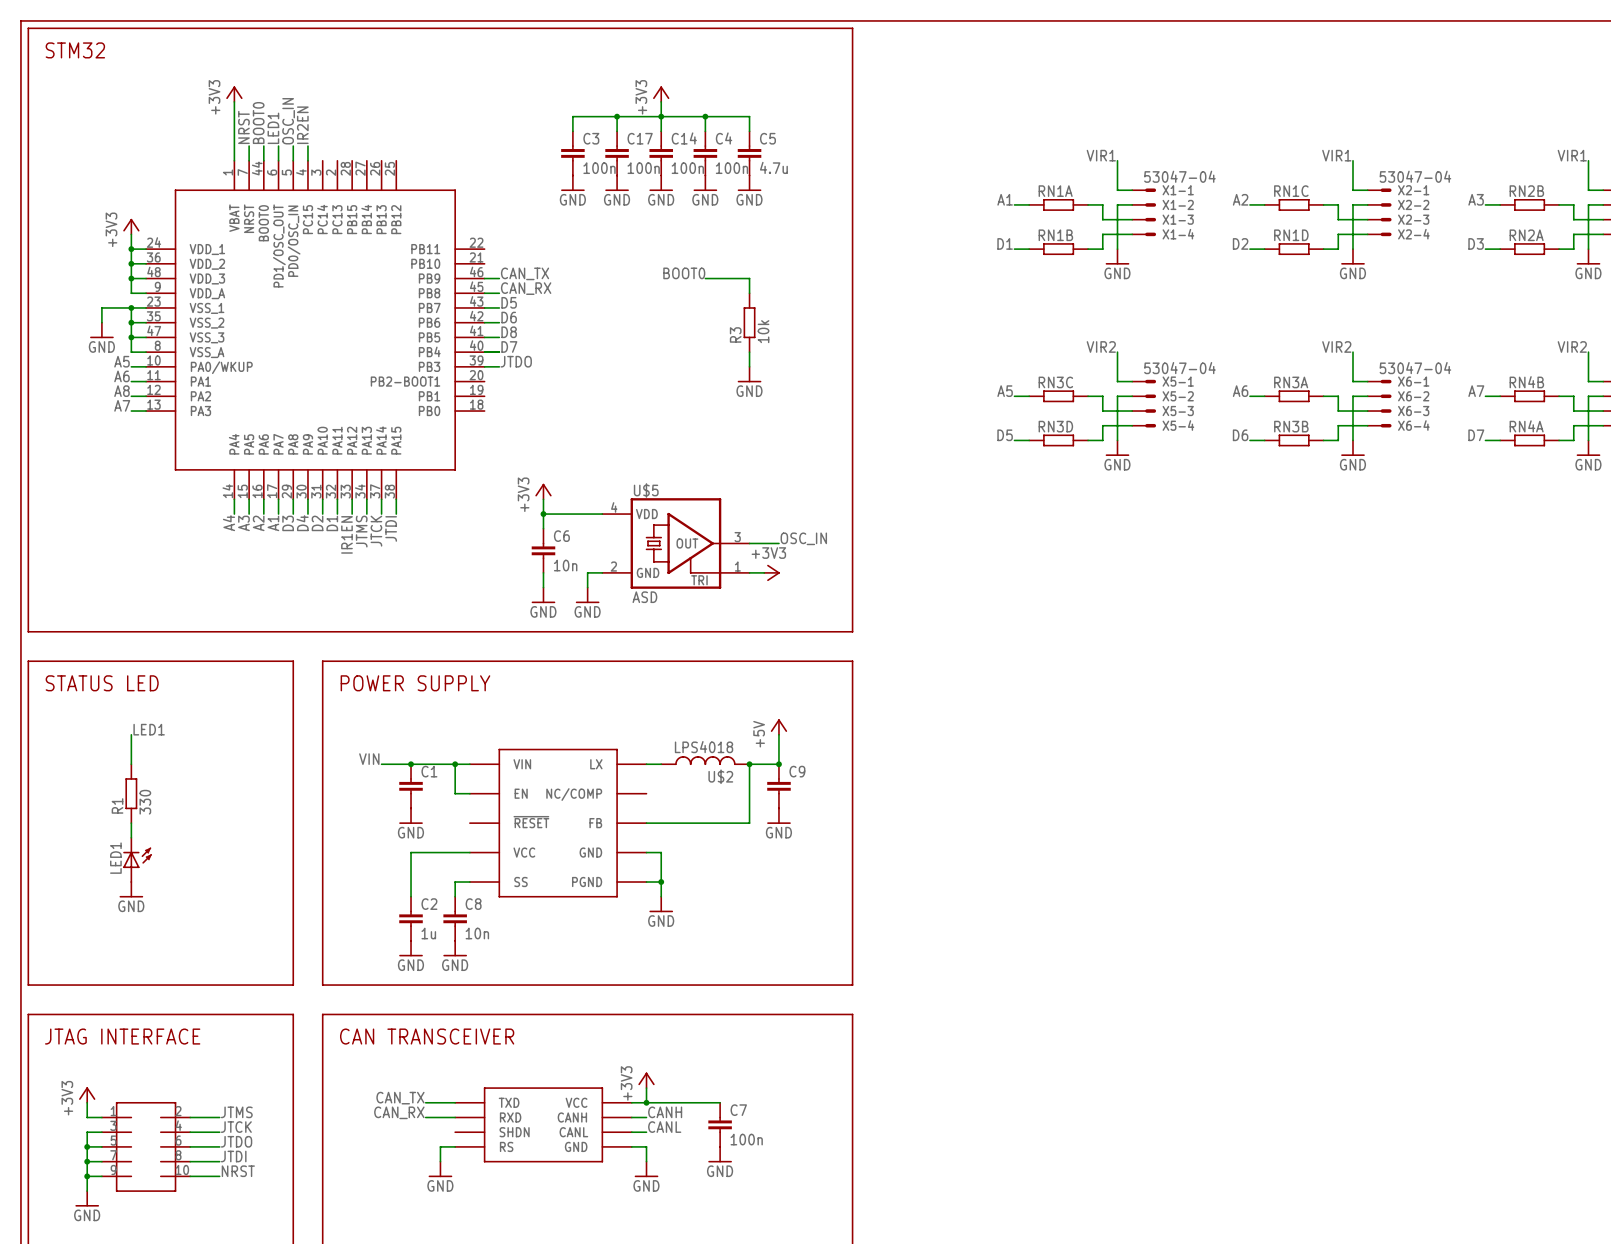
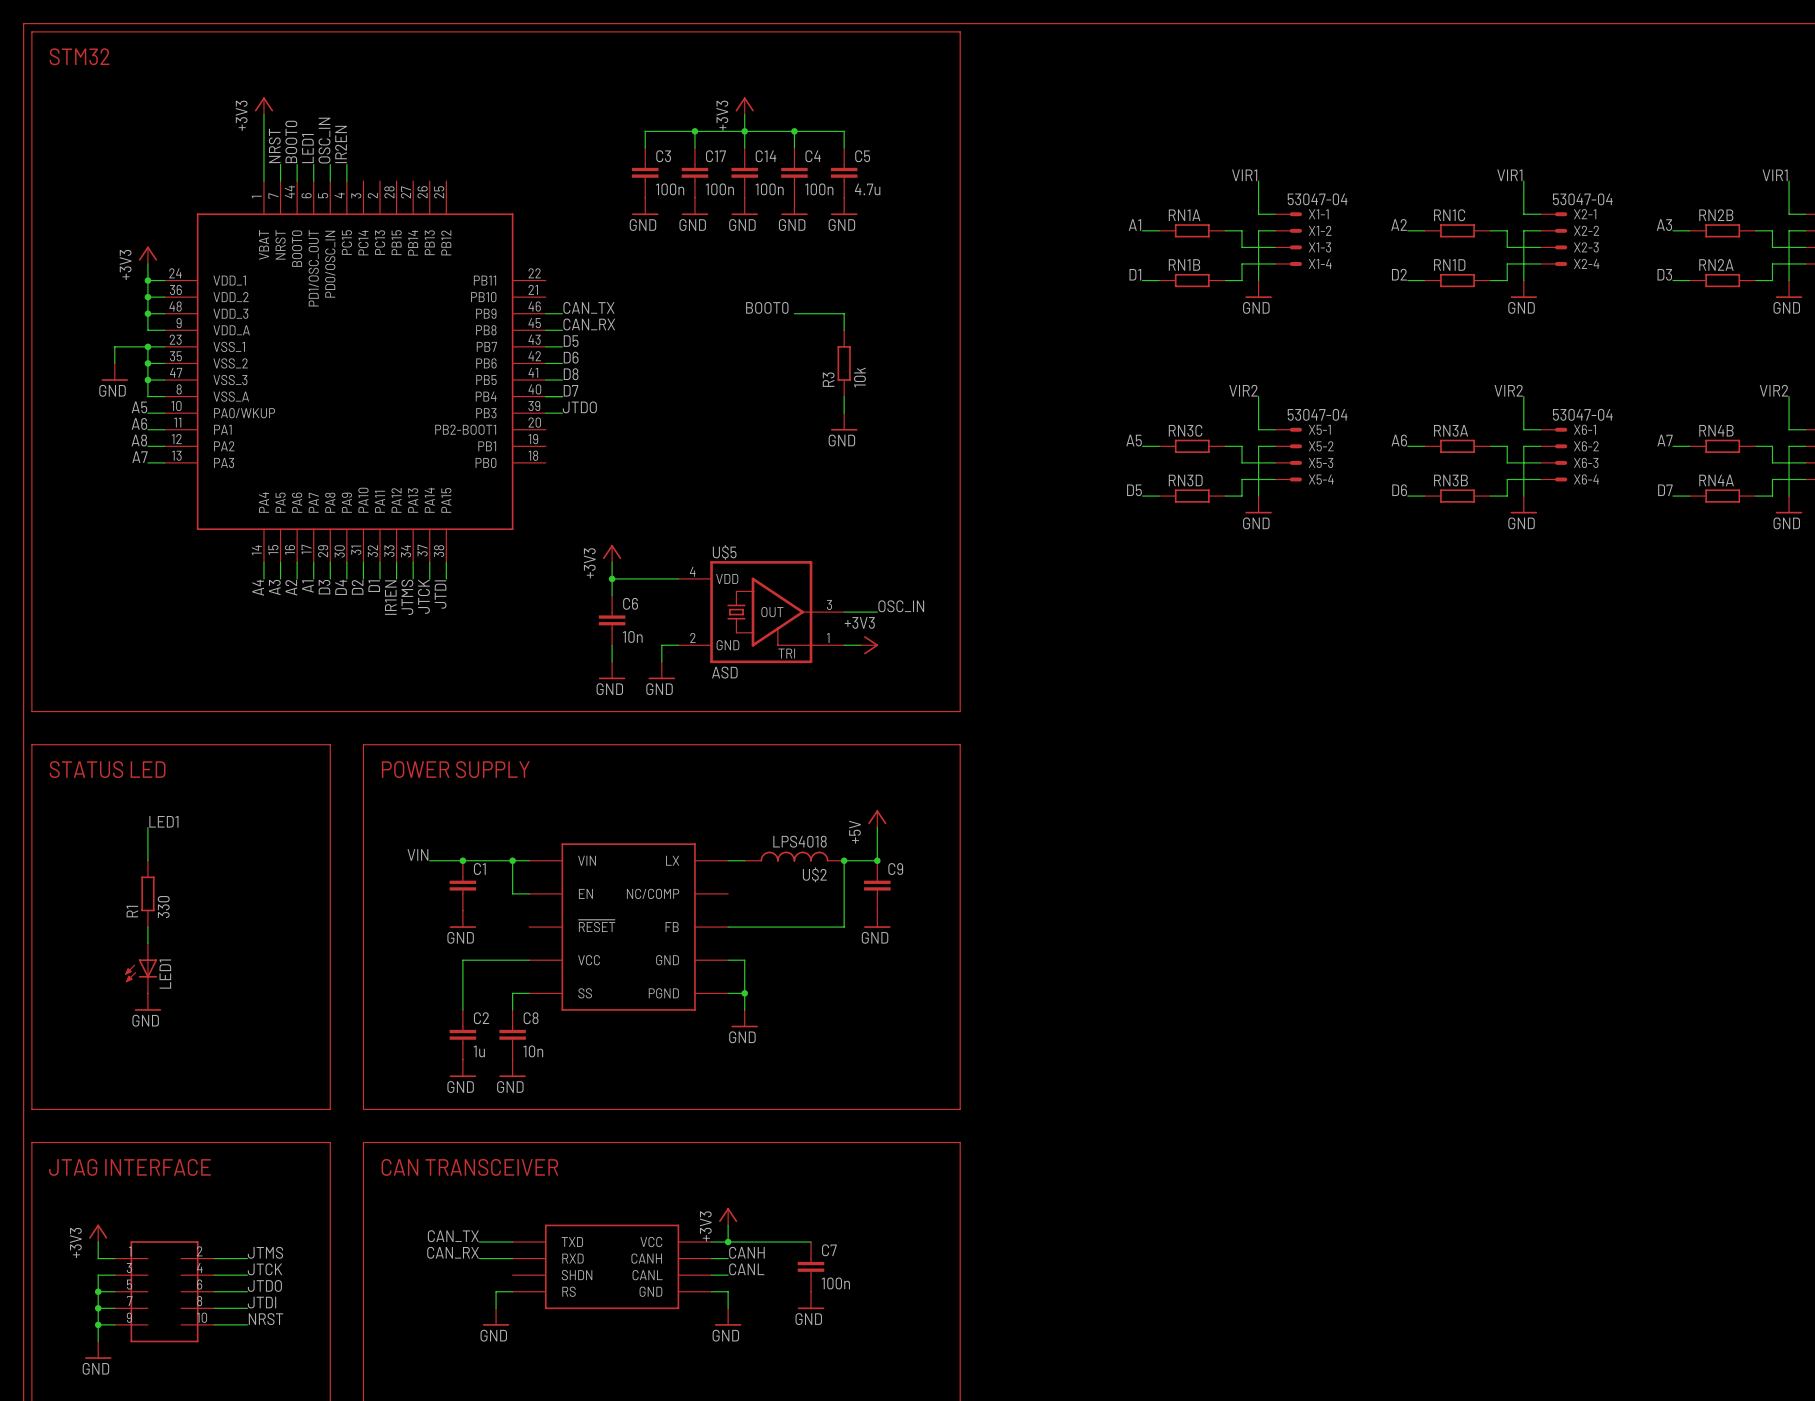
LED1 rotation: 0° (137, 857) -> 180° (141, 970)

